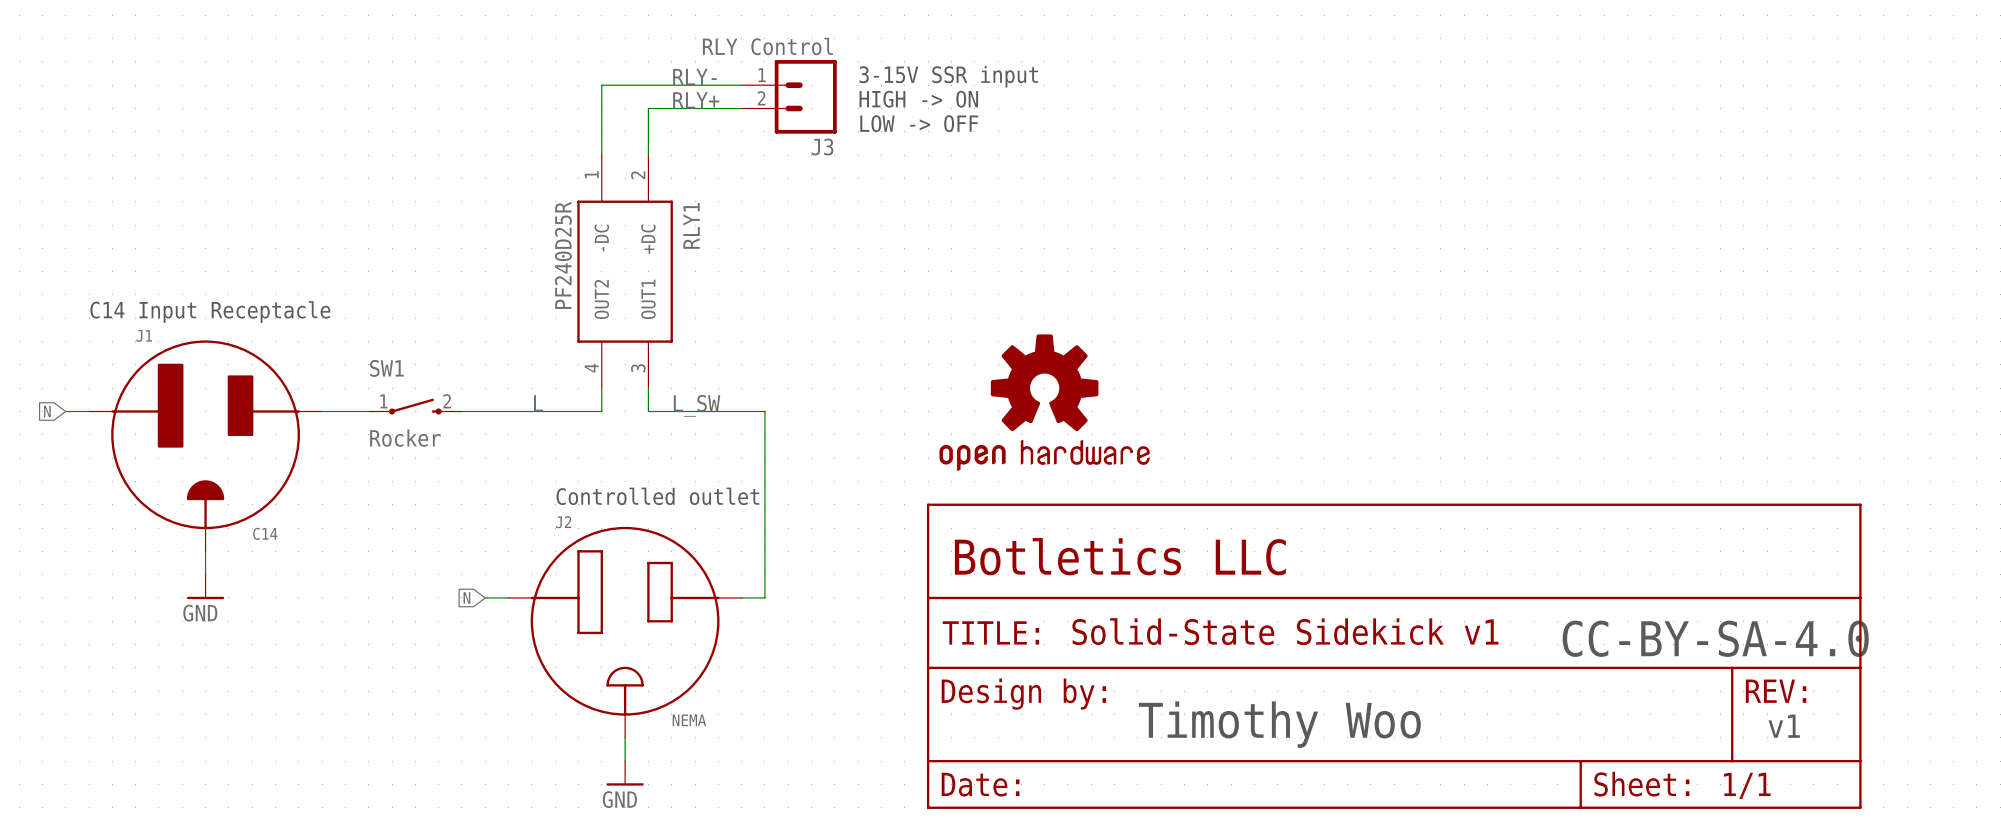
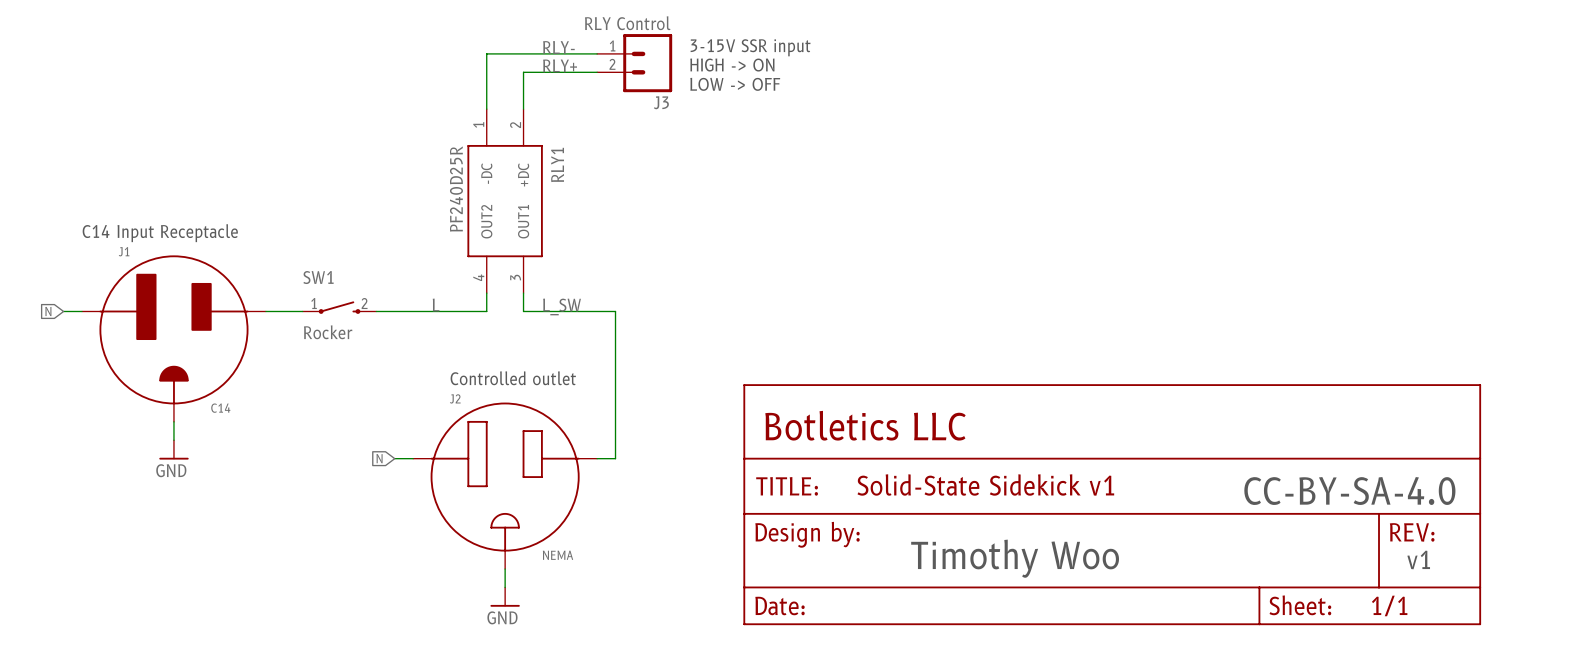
part: (1044, 402) -> none

